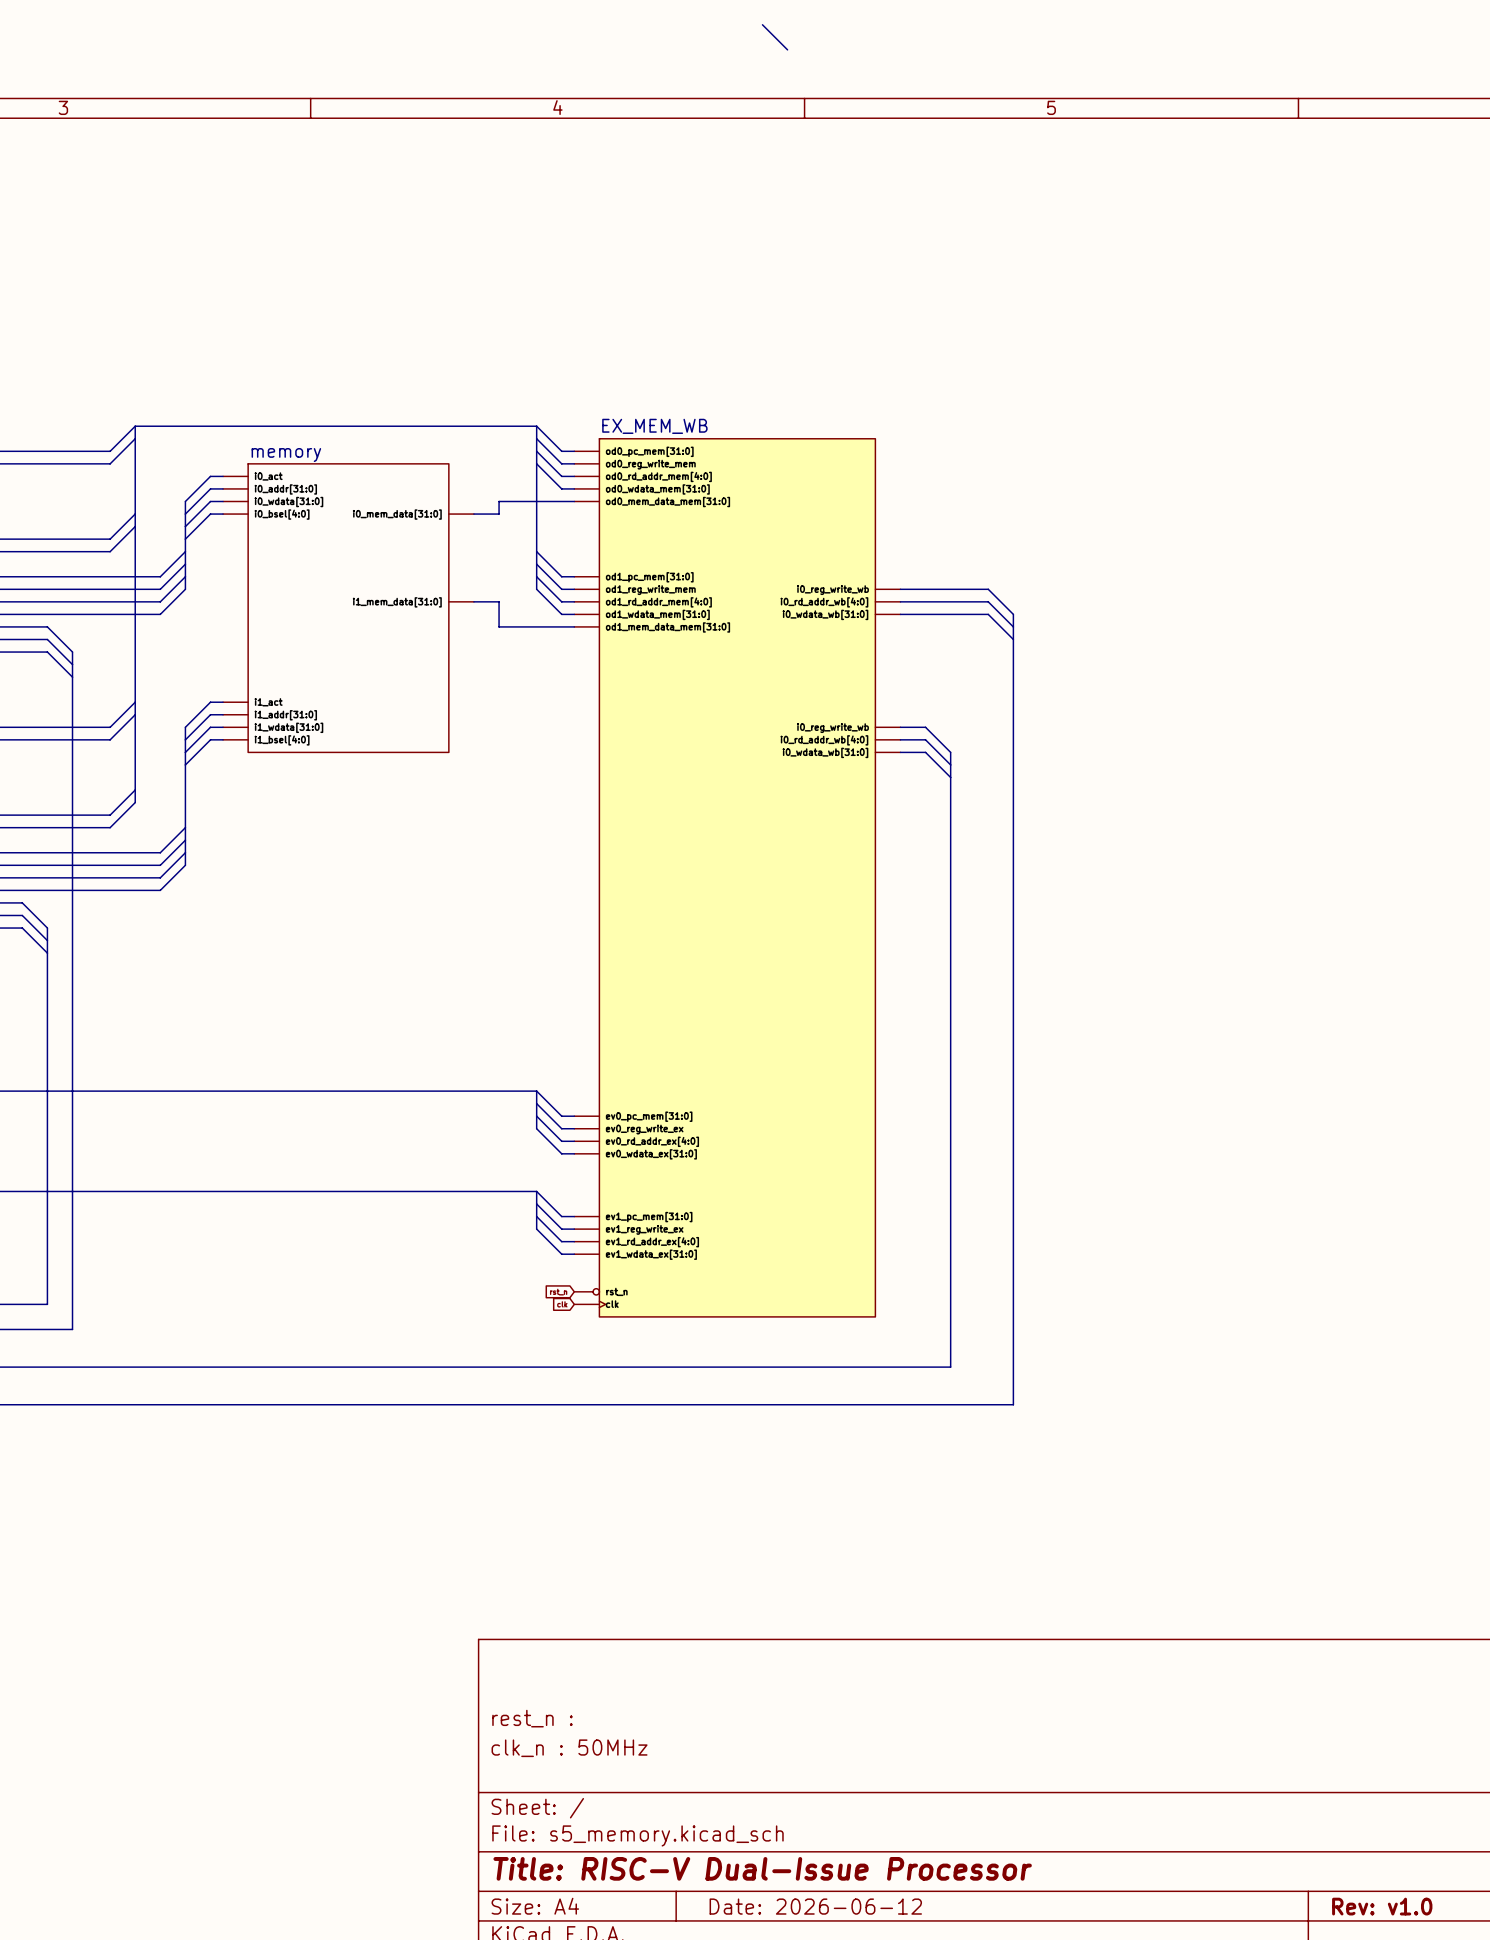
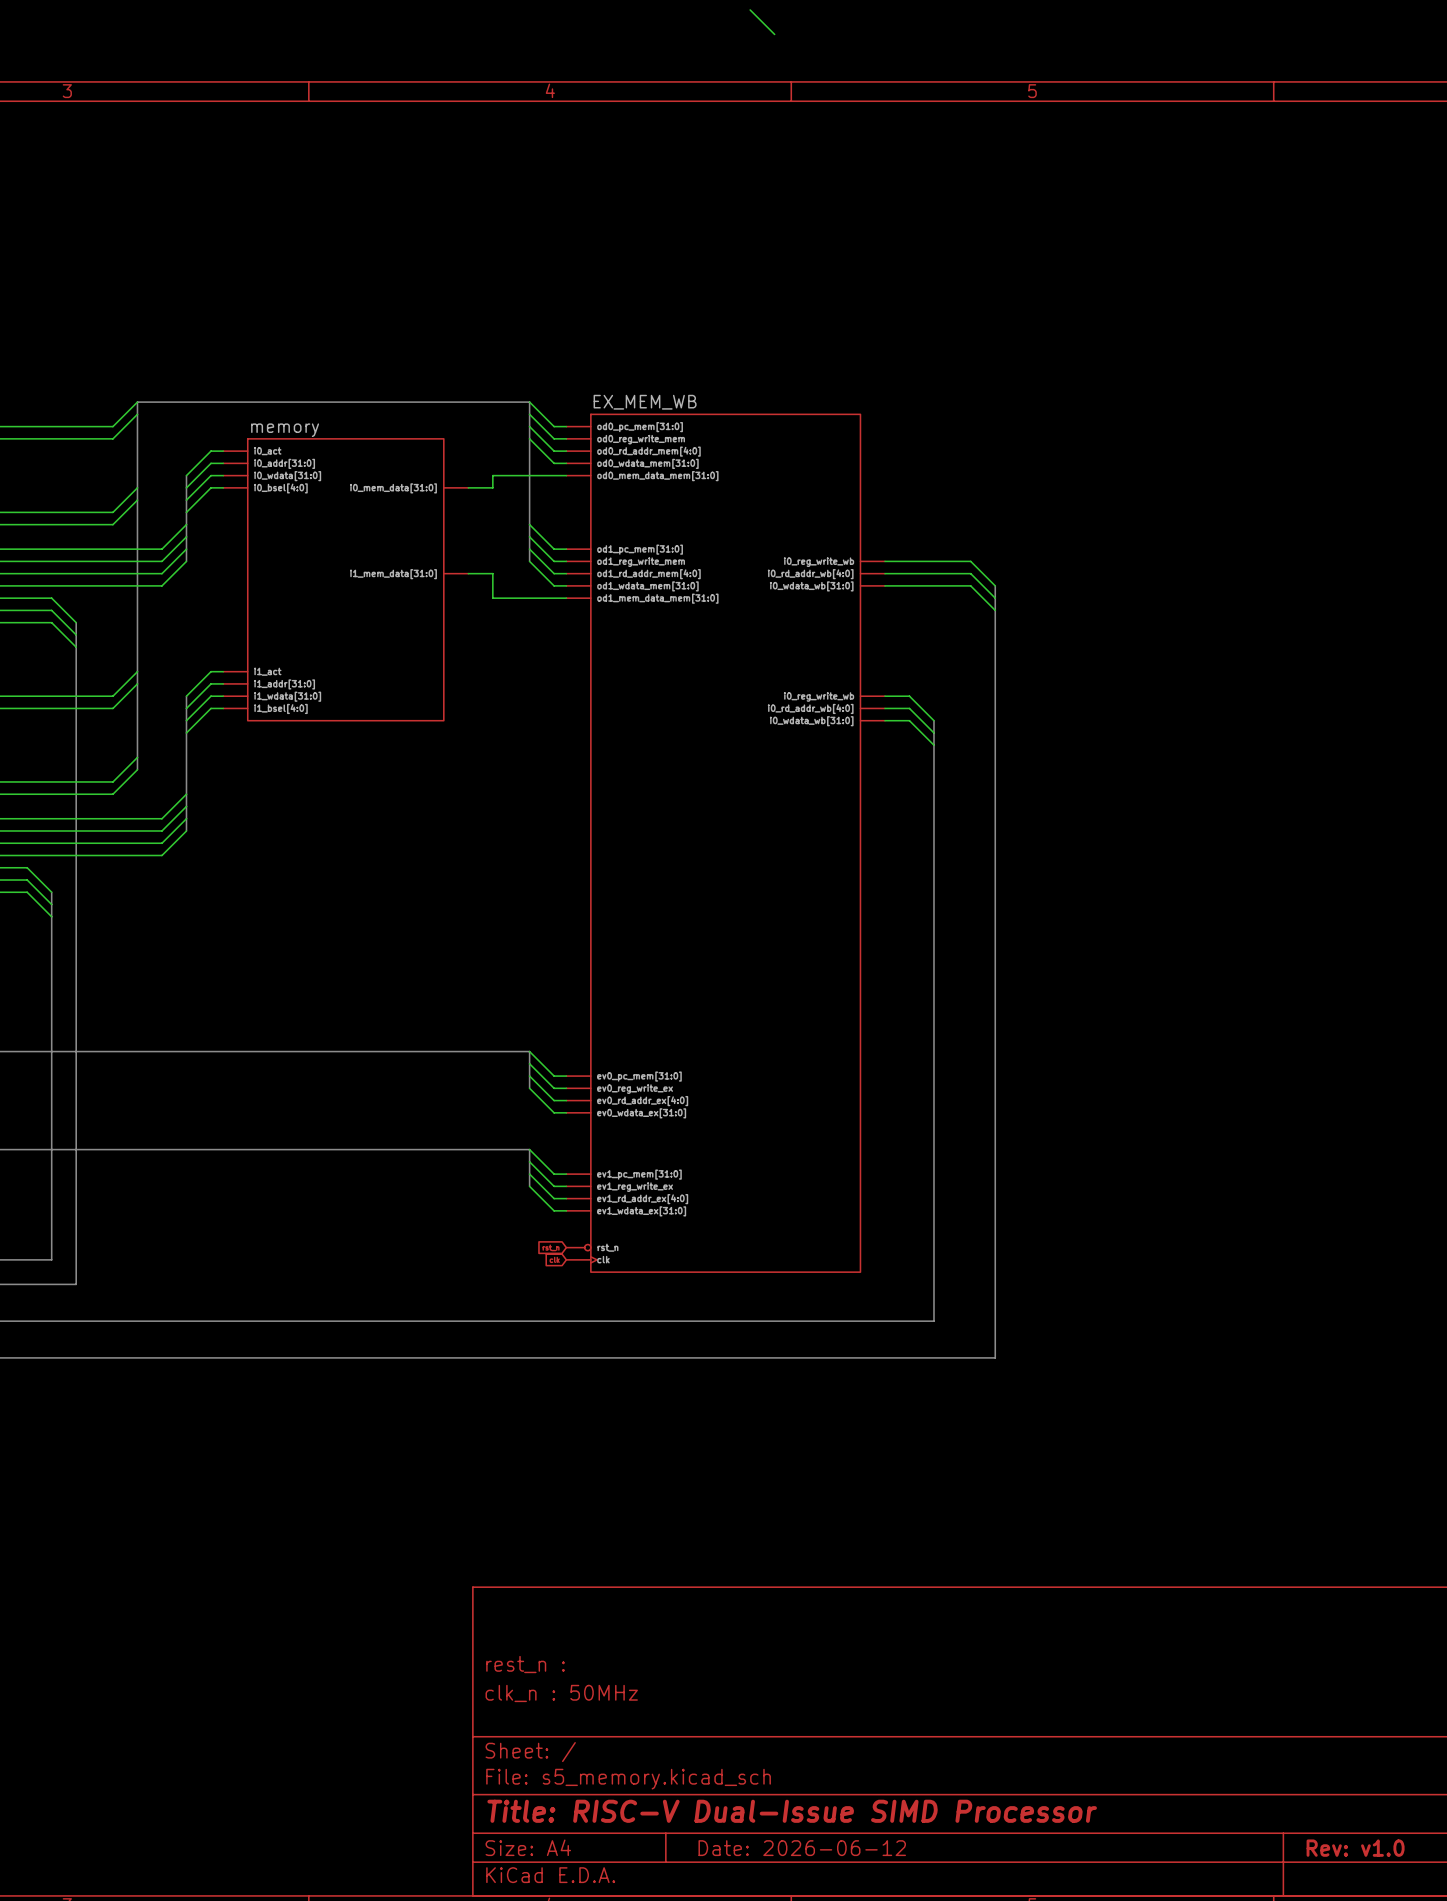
title block: Title: RISC-V Dual-Issue Processor (762, 1868) -> Title: RISC-V Dual-Issue SIMD Processor (792, 1811)

